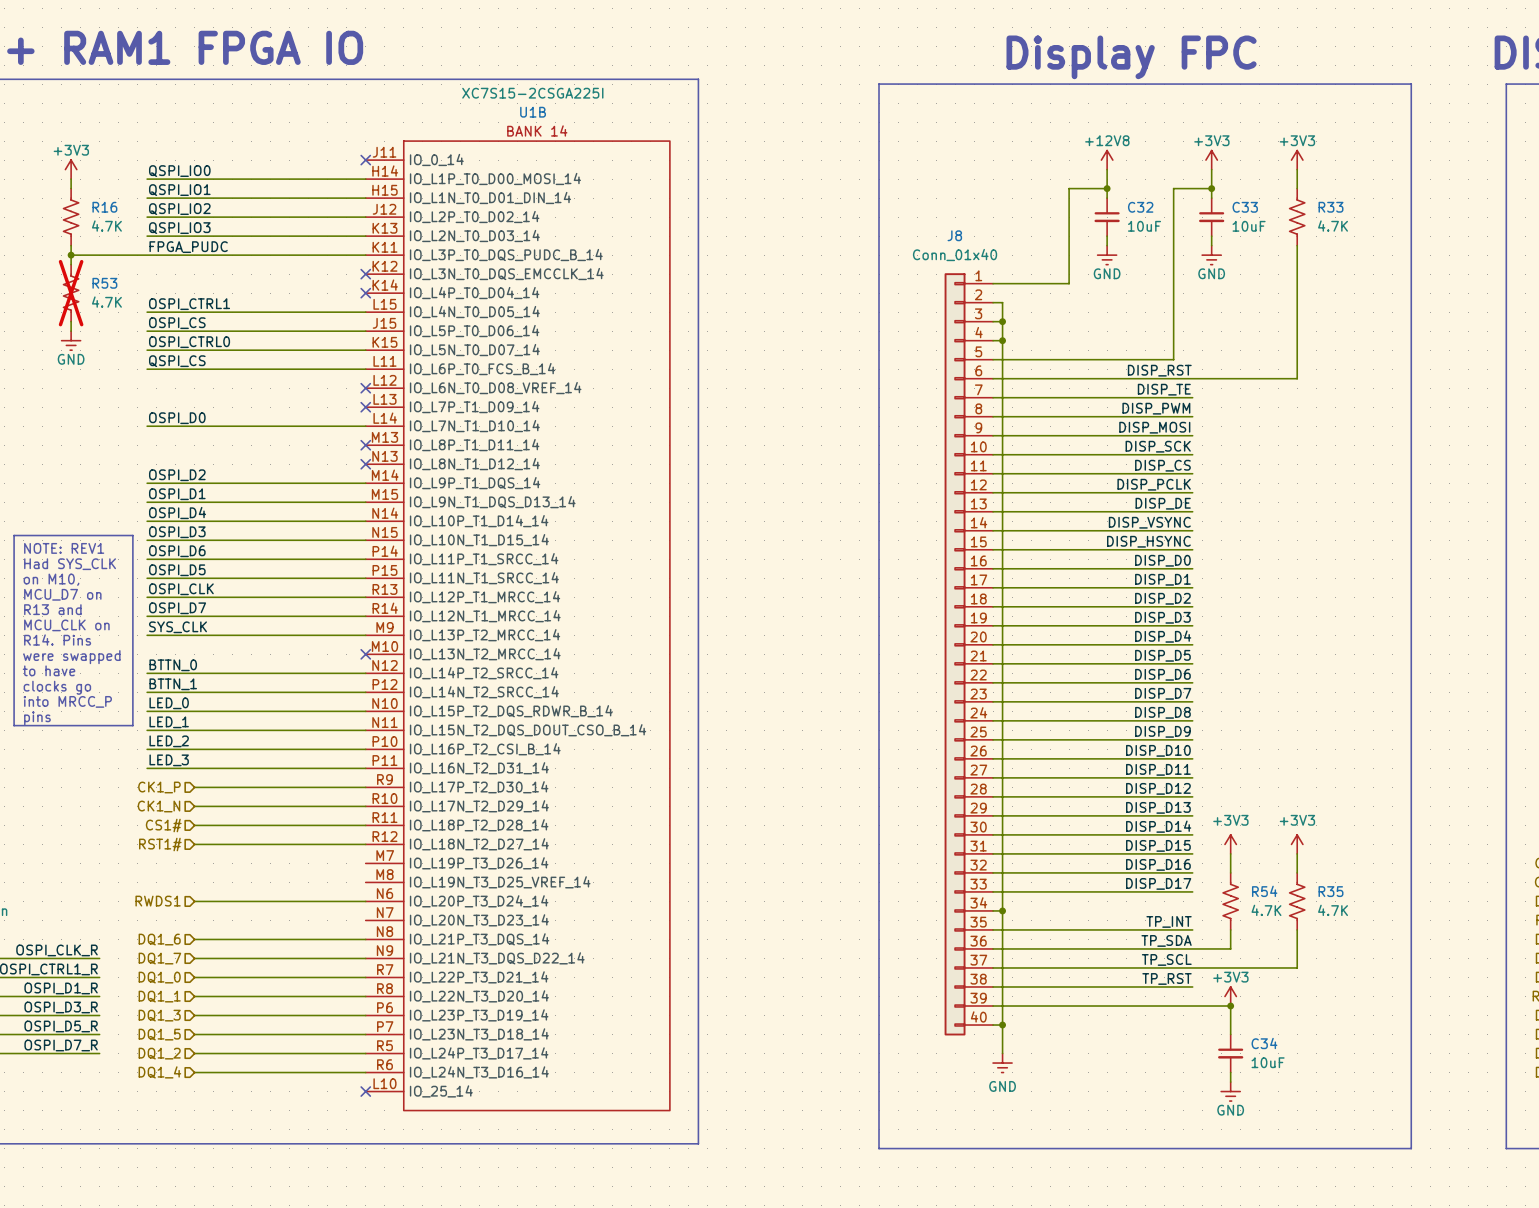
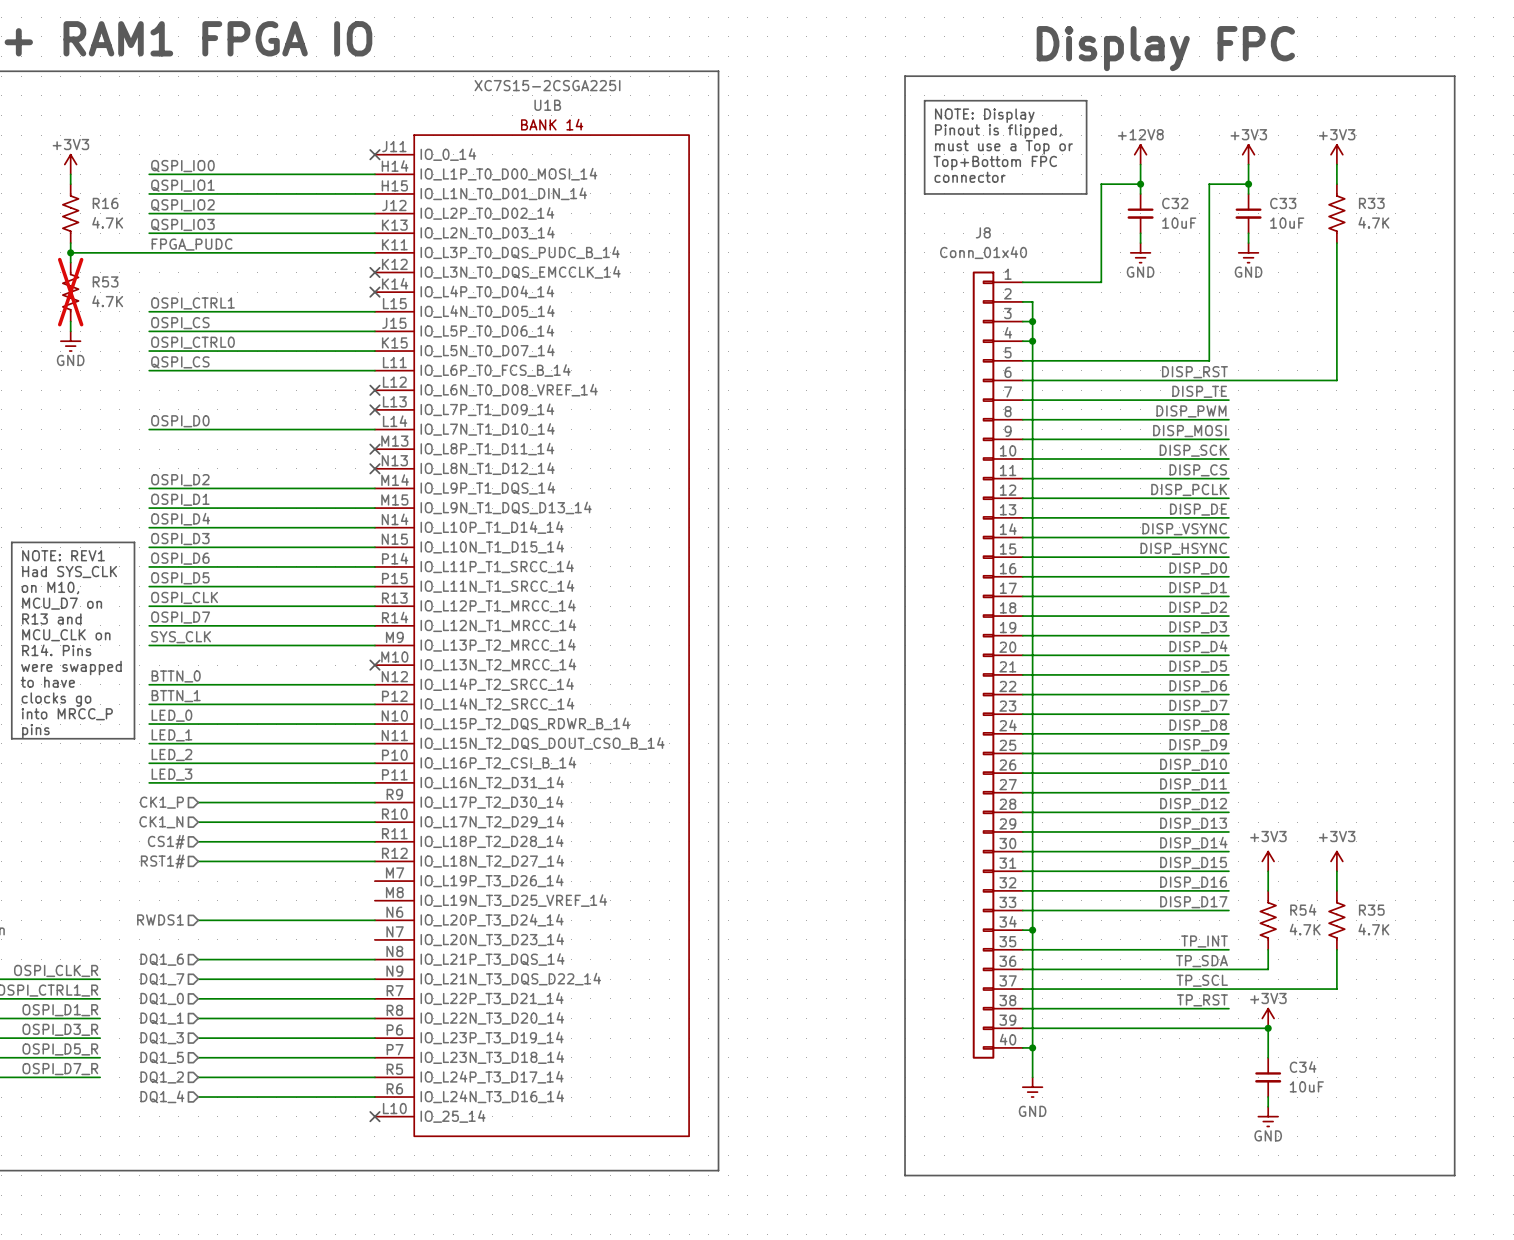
line: none -> (924, 100) (1086, 100) (1086, 193) (924, 193) (924, 100)
text: none -> NOTE: Display (984, 115)
text: none -> Pinout is flipped, (998, 131)
text: none -> must use a Top or (1003, 147)
text: none -> Top+Bottom FPC (995, 163)
text: none -> connector (970, 177)

